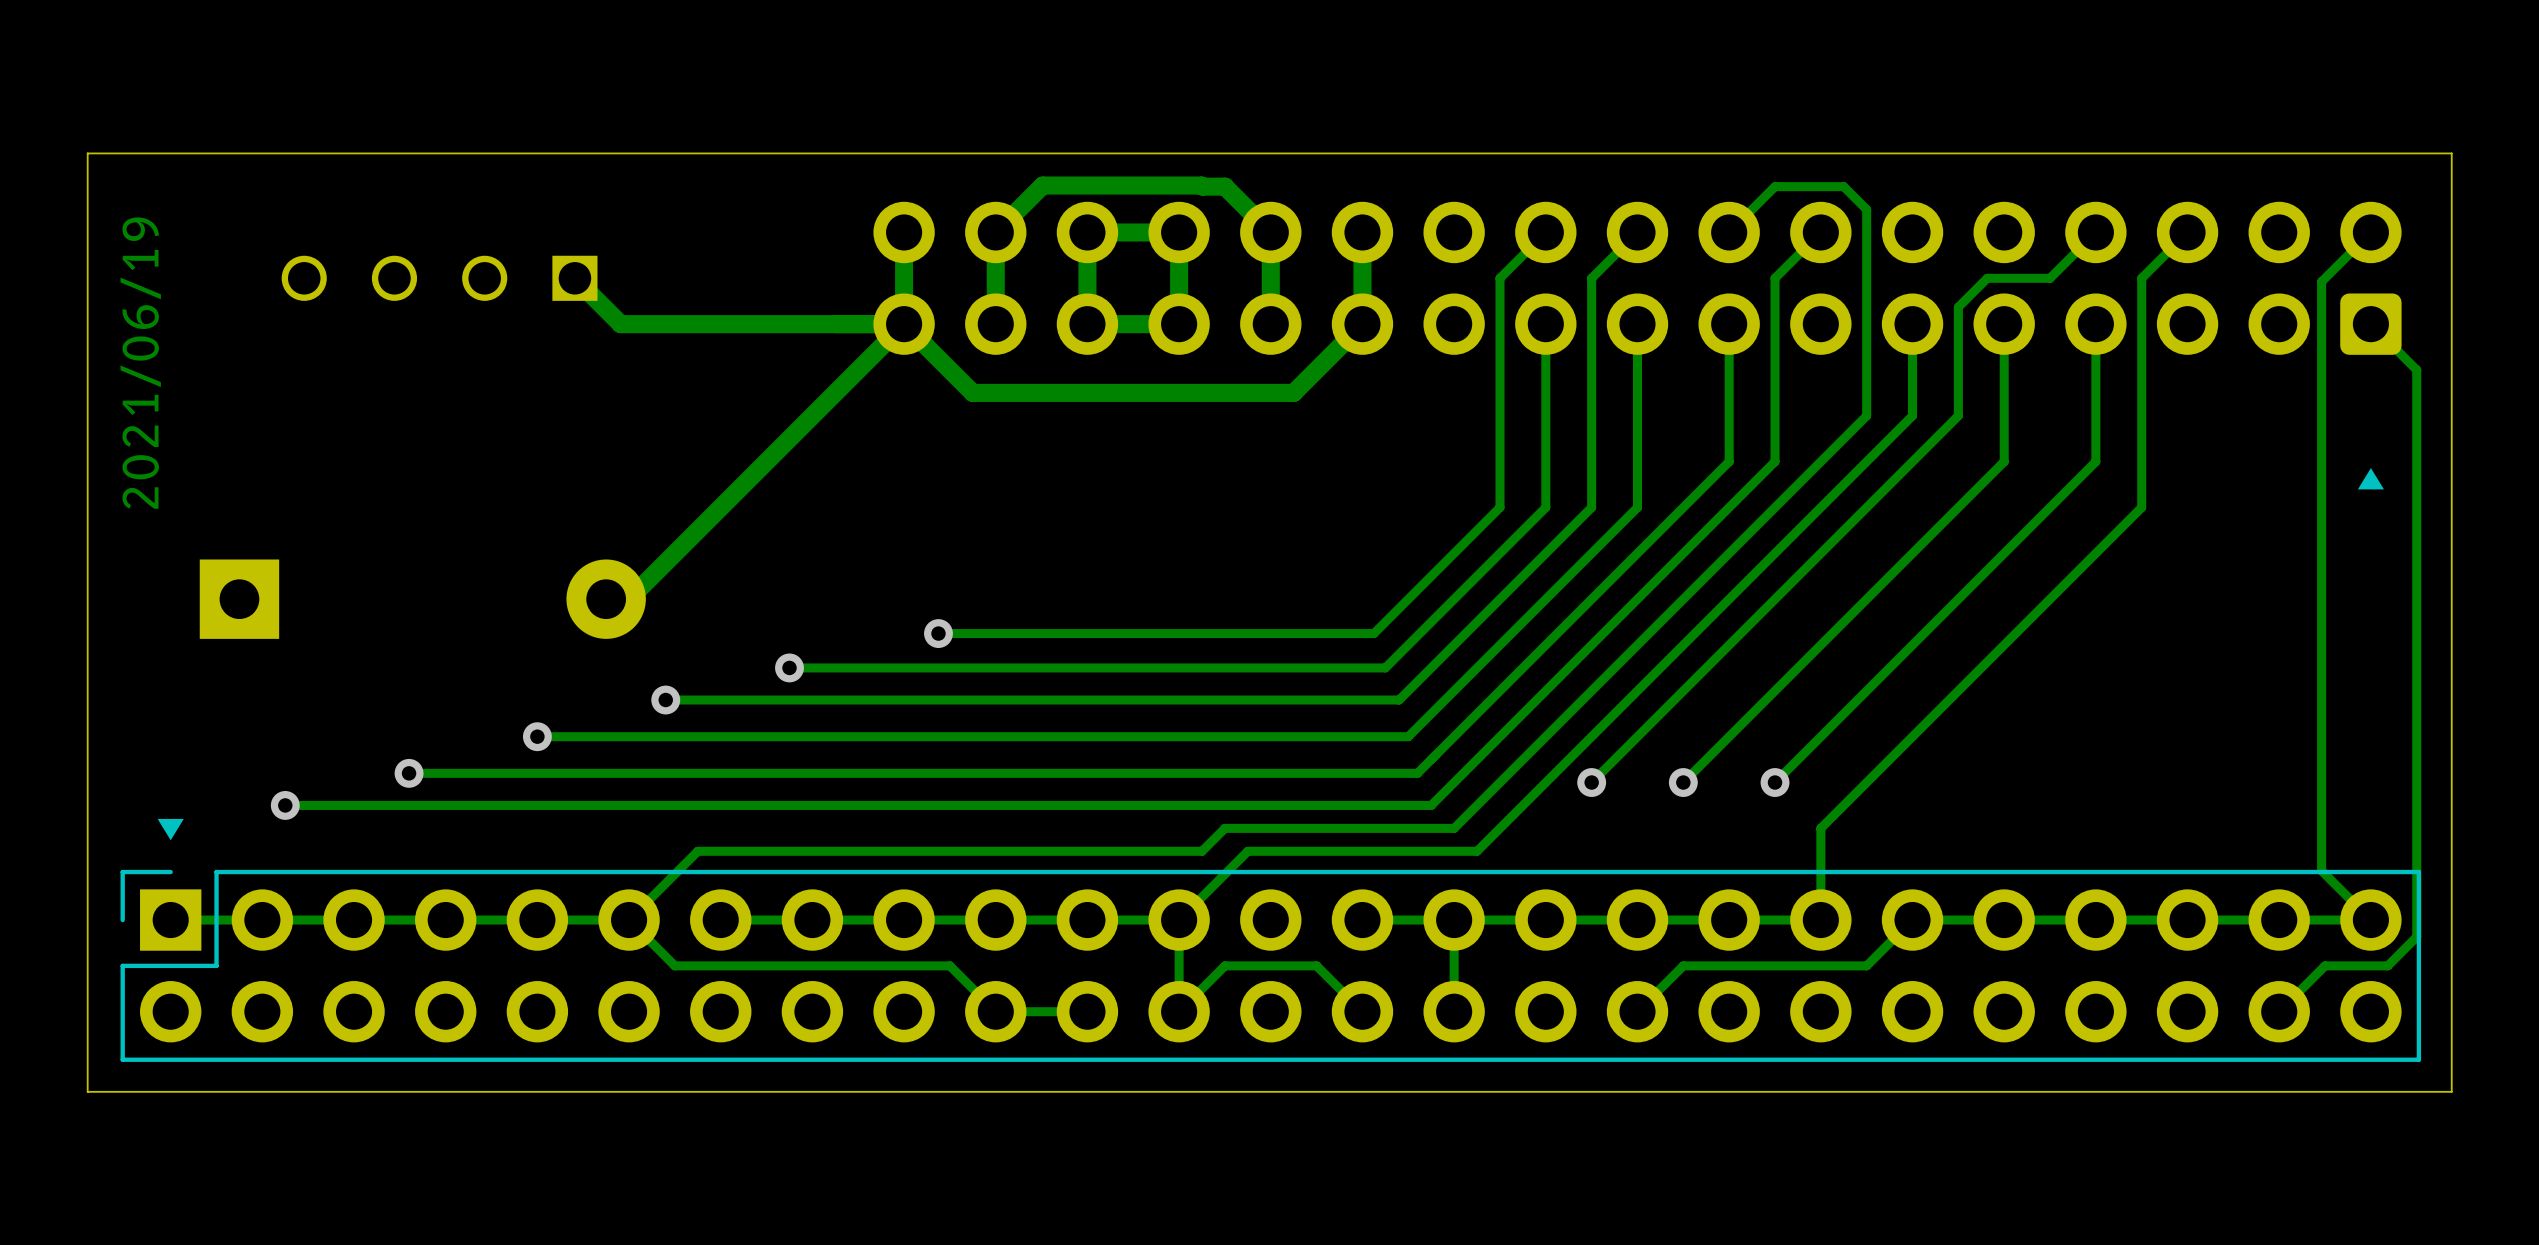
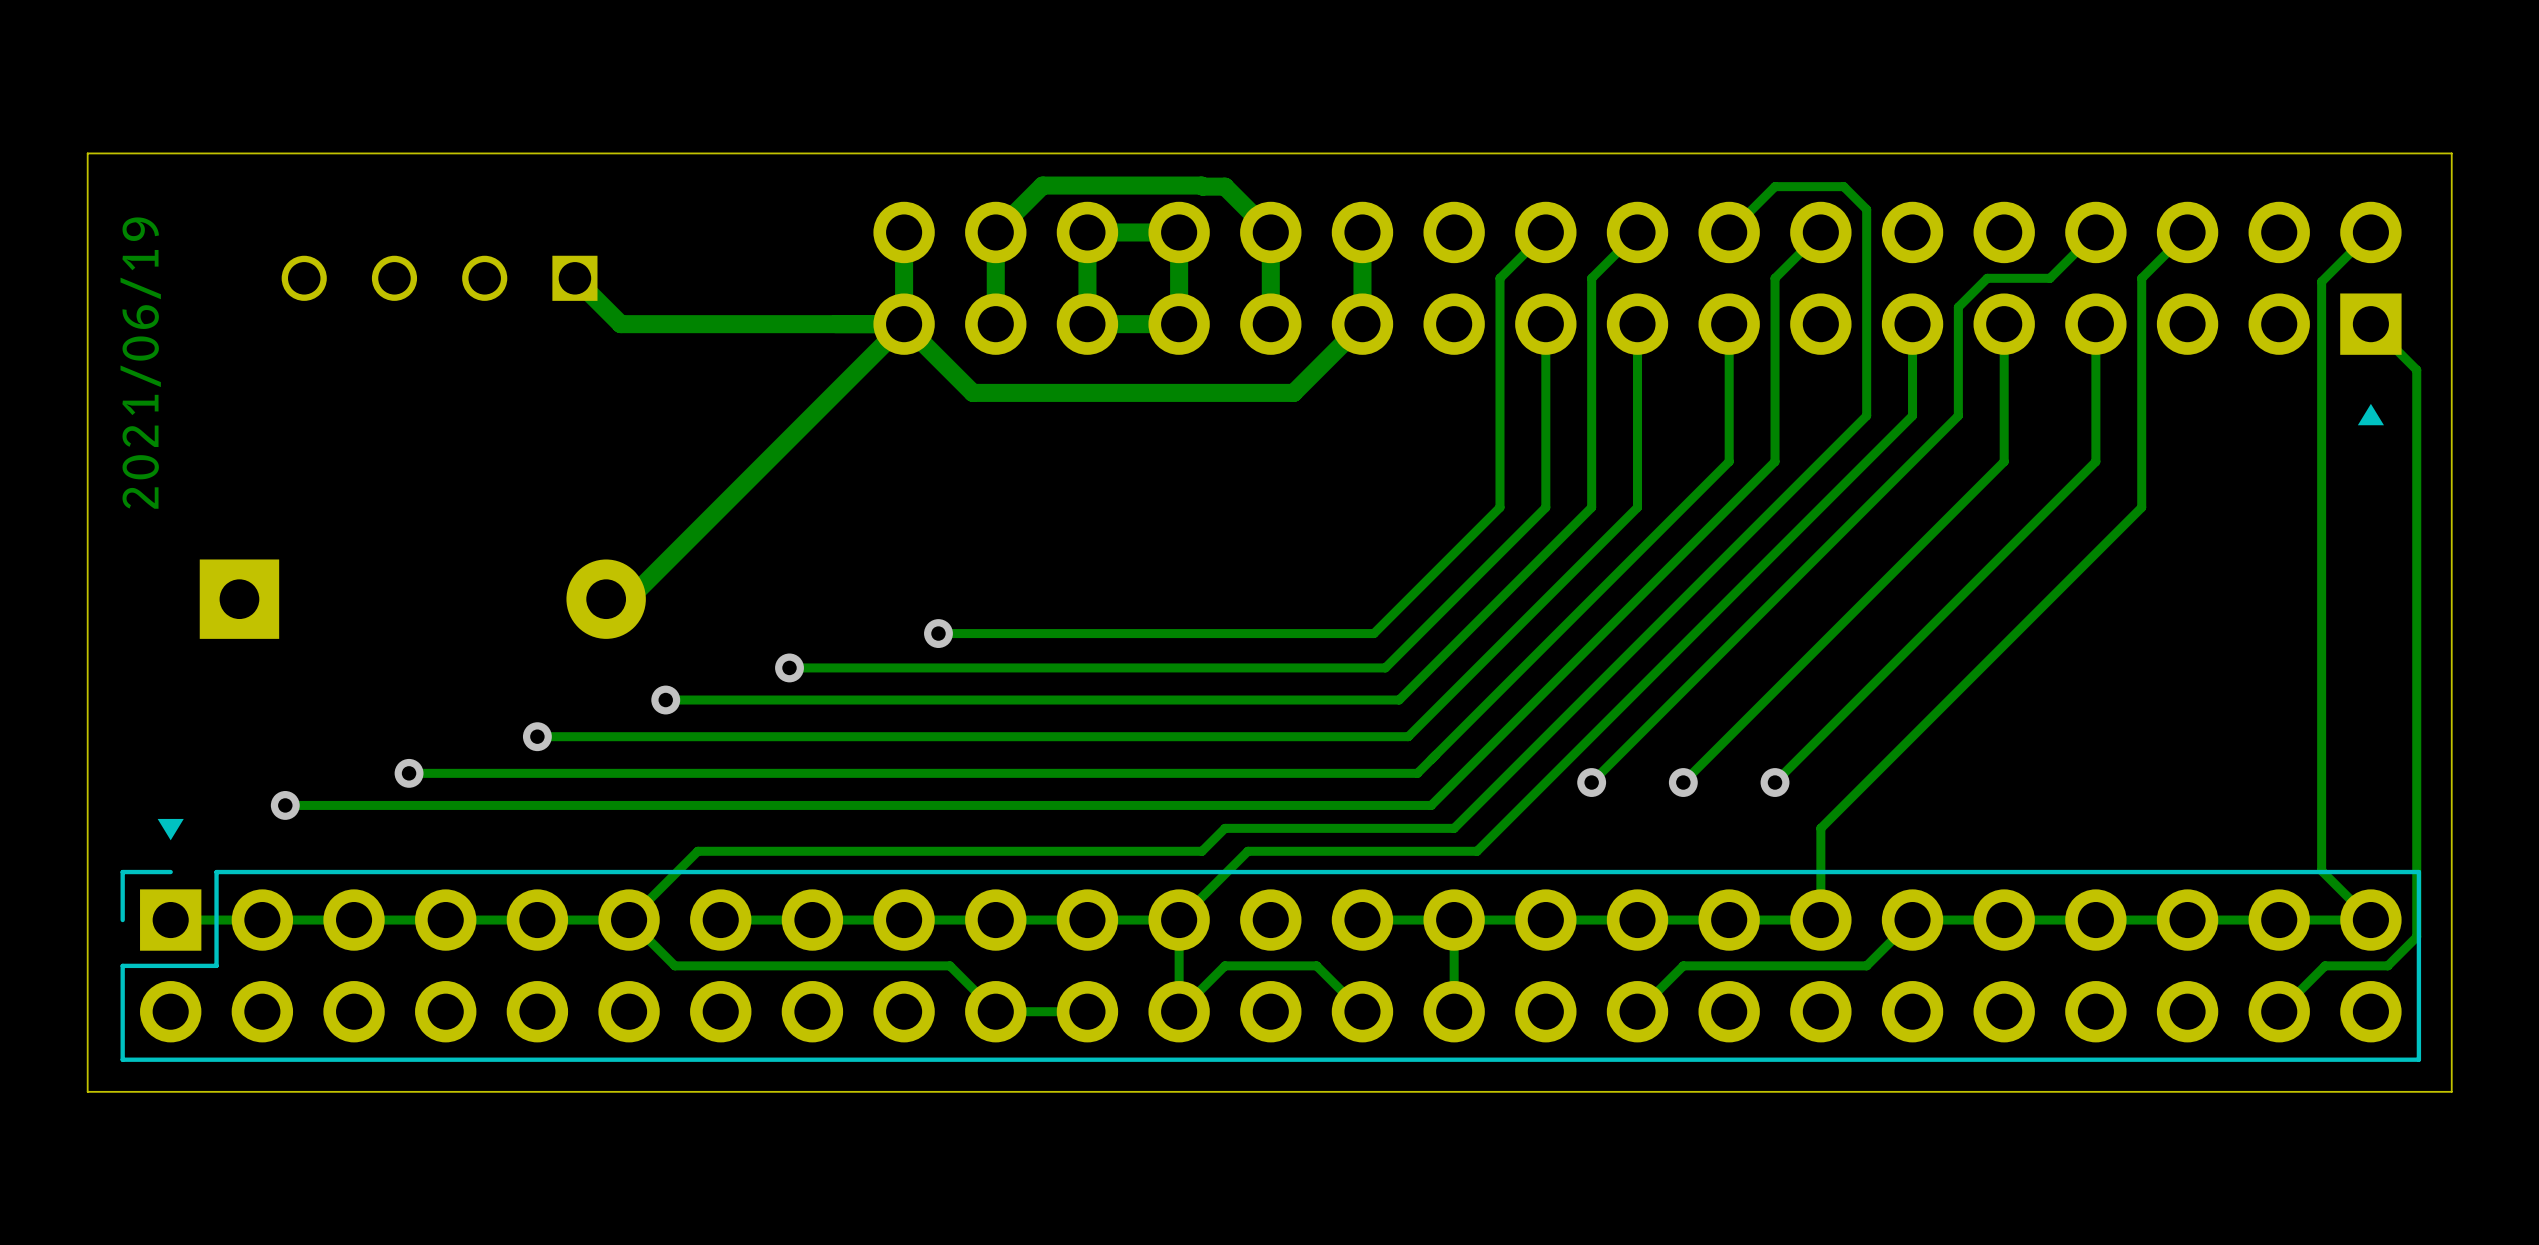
part footprint: [873, 201, 2402, 355] -> [873, 201, 2402, 355]
text position: ▼ (2370, 478) -> ▼ (2370, 414)

